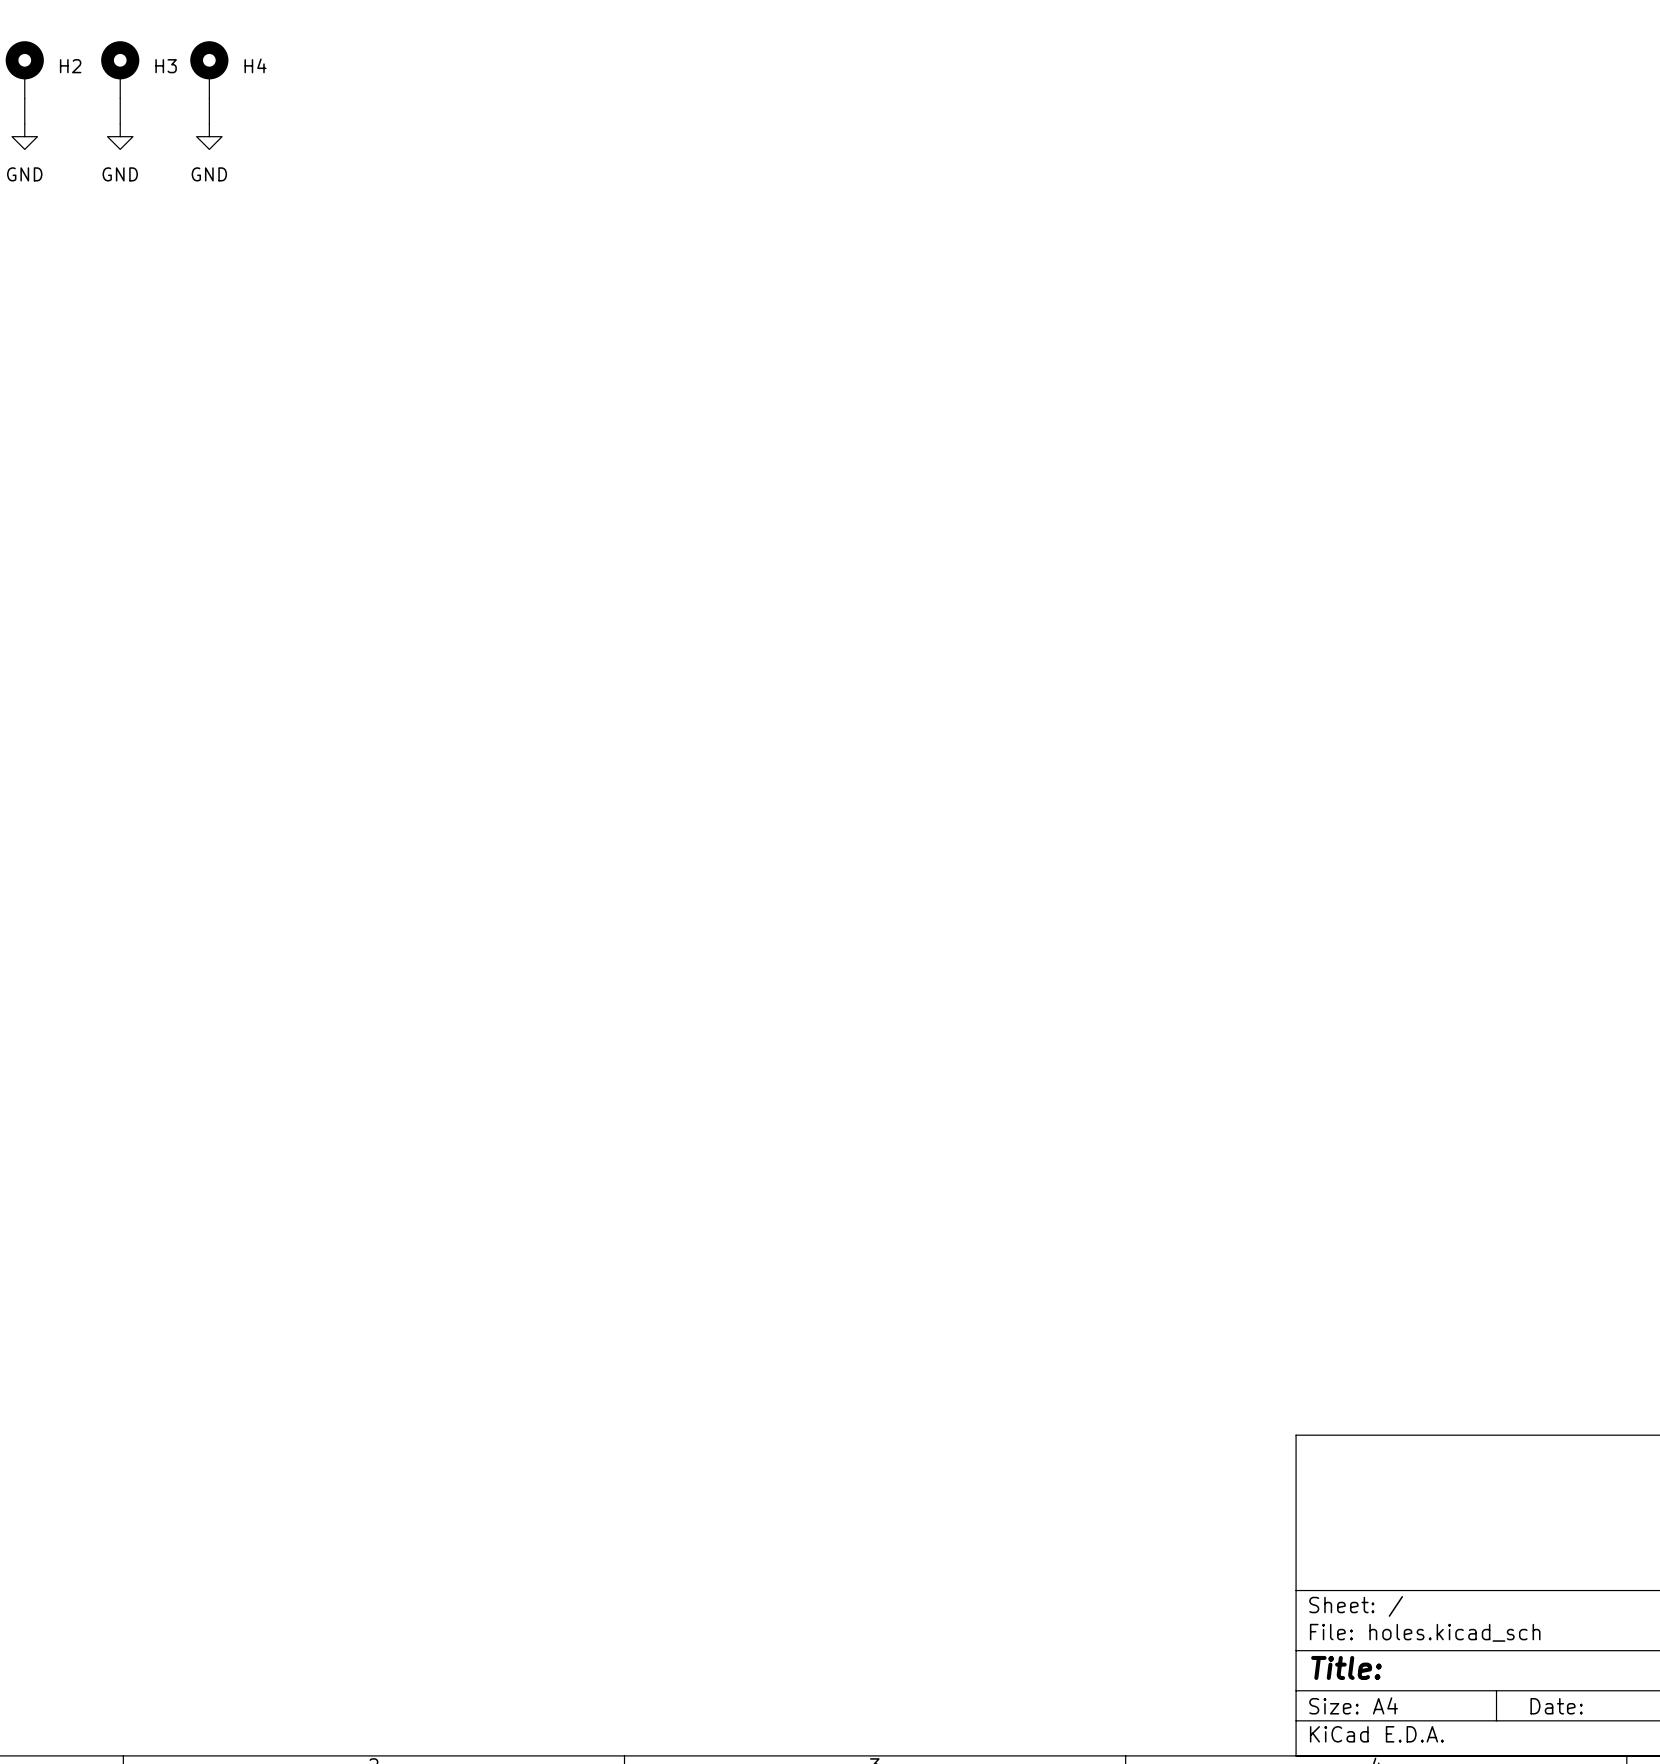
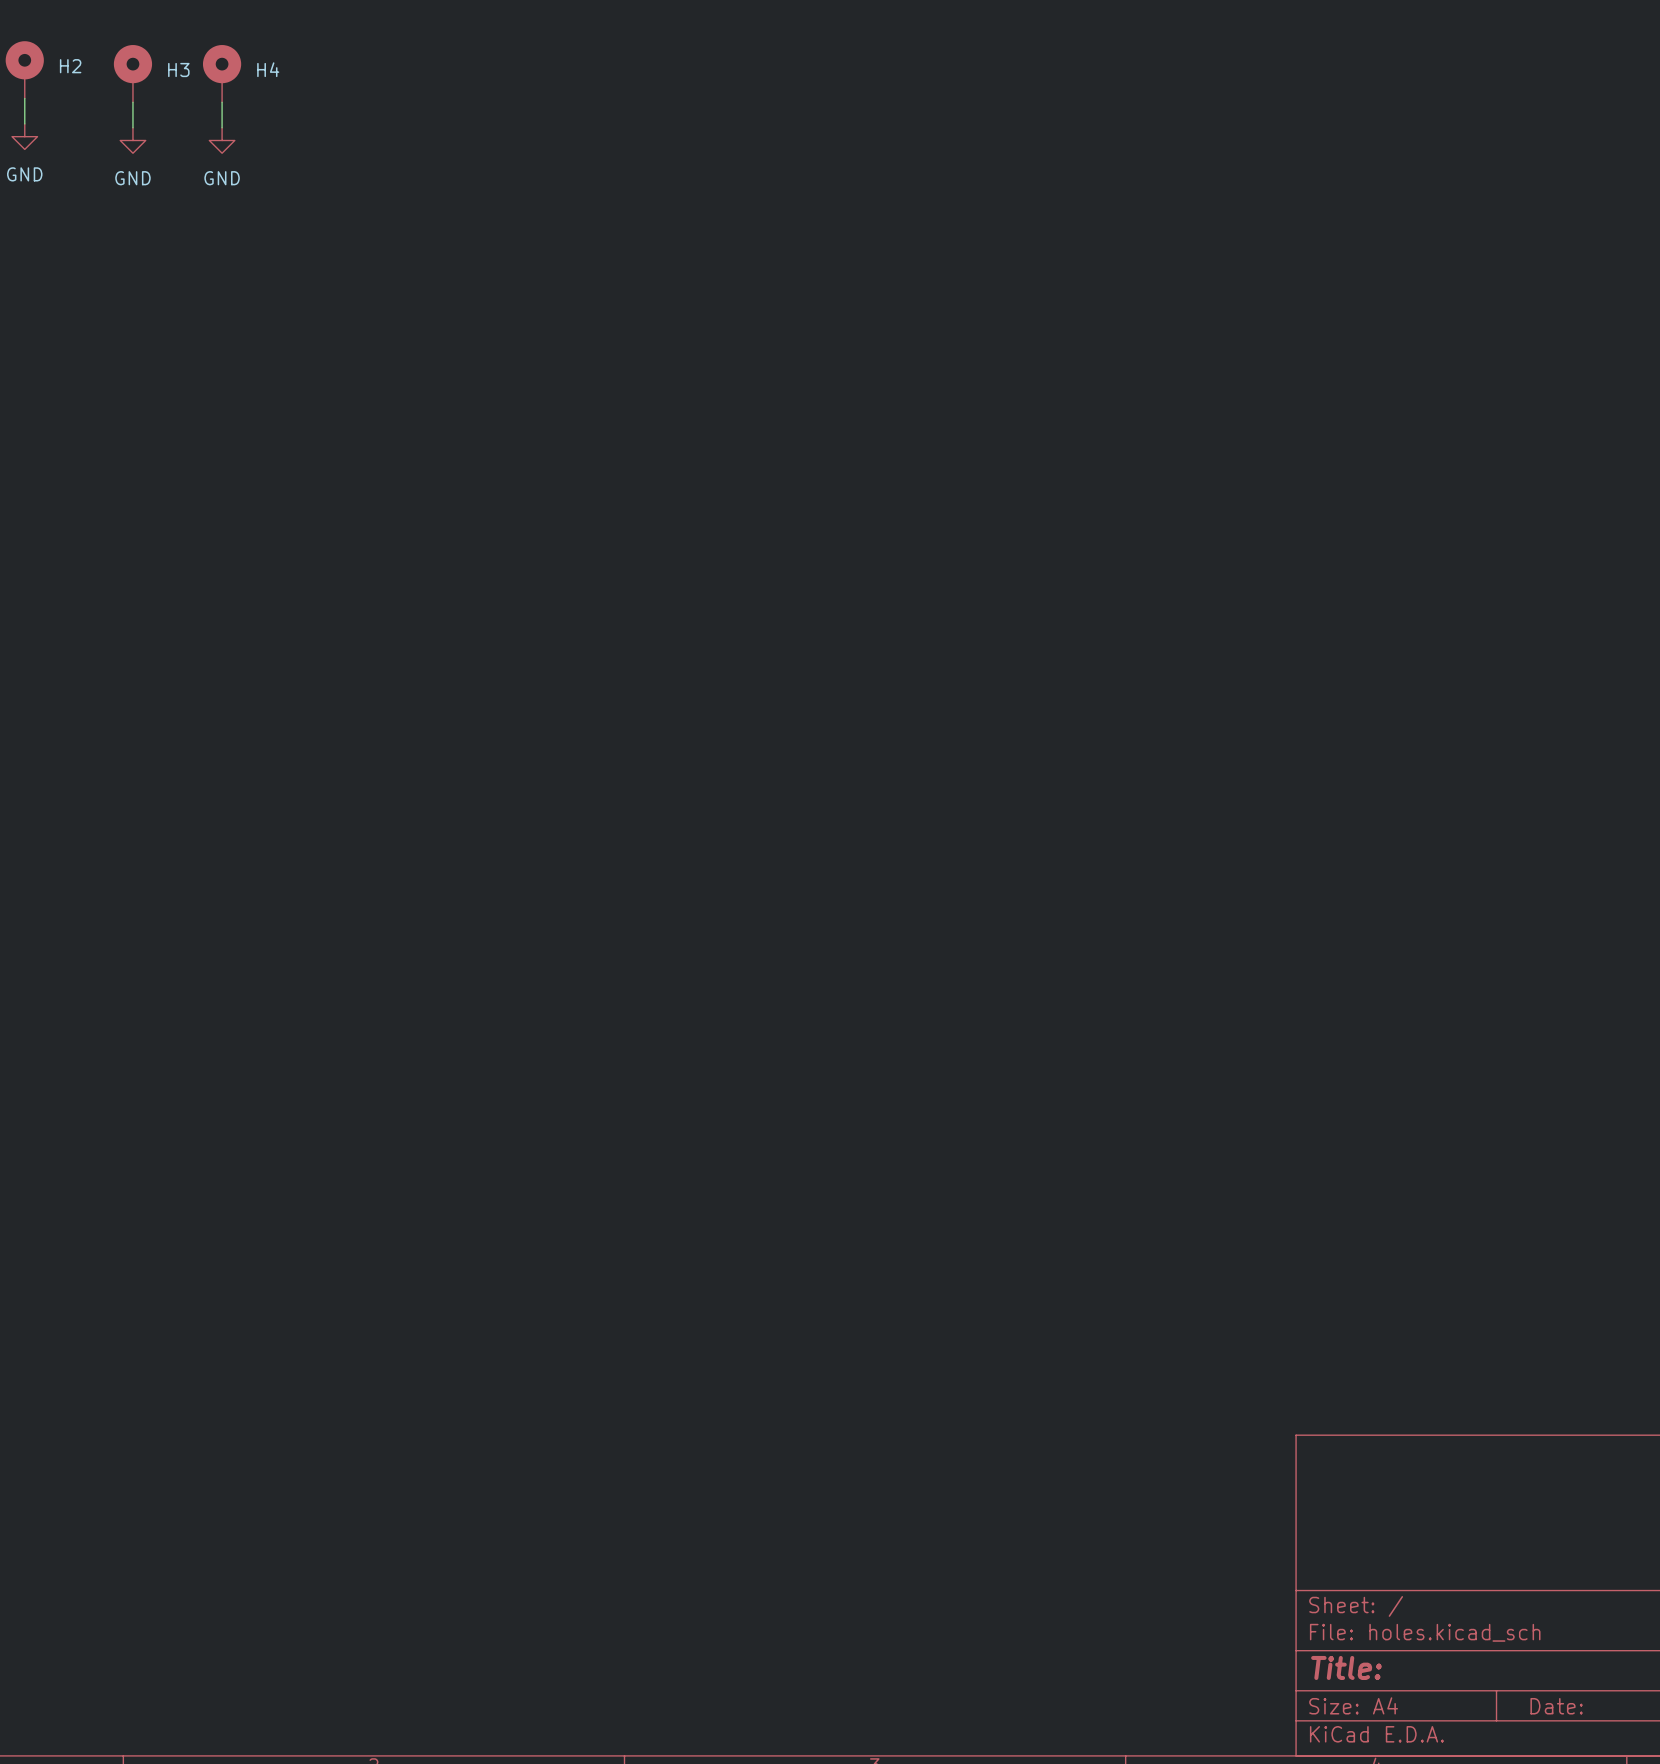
H3 position: (120, 69) -> (132, 73)
H4 position: (209, 69) -> (222, 73)
wire: (120, 98) (120, 123) -> (132, 102) (132, 127)
wire: (209, 98) (209, 123) -> (222, 102) (222, 127)
power symbol position: GND (120, 136) -> GND (132, 140)
power symbol position: GND (209, 136) -> GND (222, 140)

